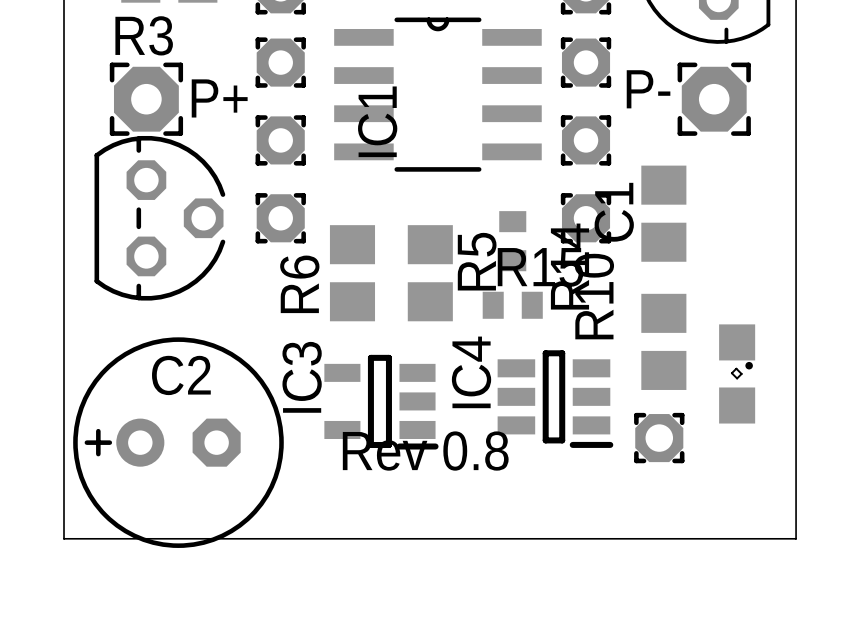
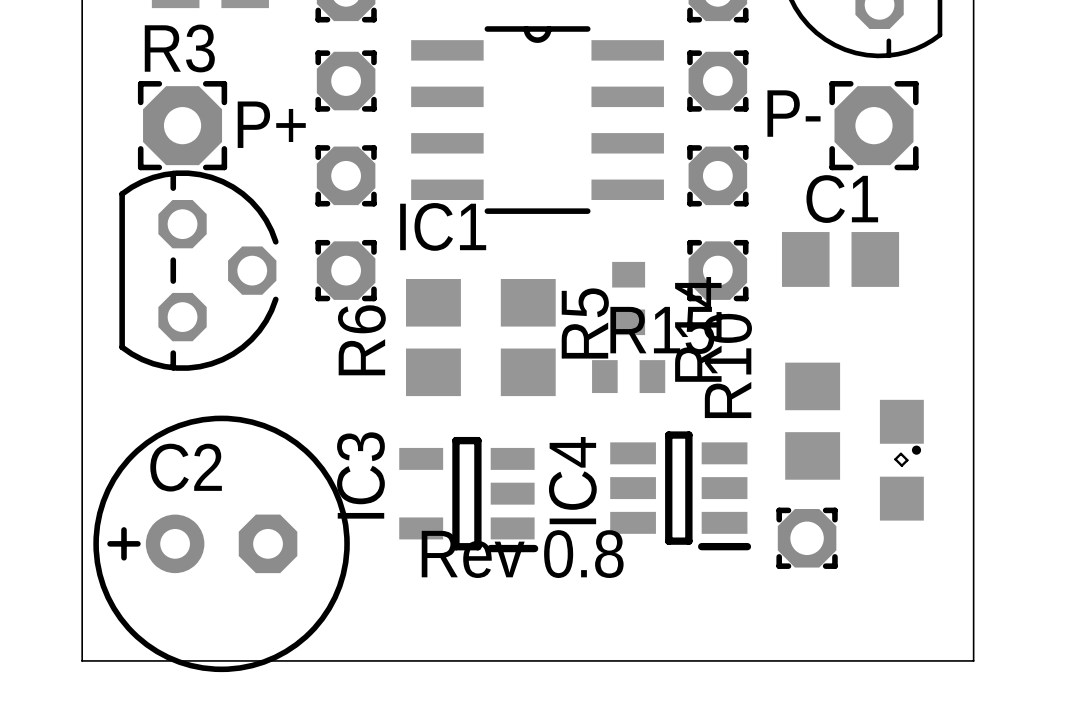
IC1 name rotation: 0° (377, 121) -> 90° clockwise (443, 226)
C1 rotation: 0° (663, 213) -> 90° clockwise (840, 259)
R6 name position: R6 (299, 284) -> R6 (361, 340)
IC4 name position: IC4 (471, 372) -> IC4 (572, 480)
C2 name position: C2 (181, 375) -> C2 (186, 467)
IC3 name position: IC3 (302, 377) -> IC3 (360, 475)

